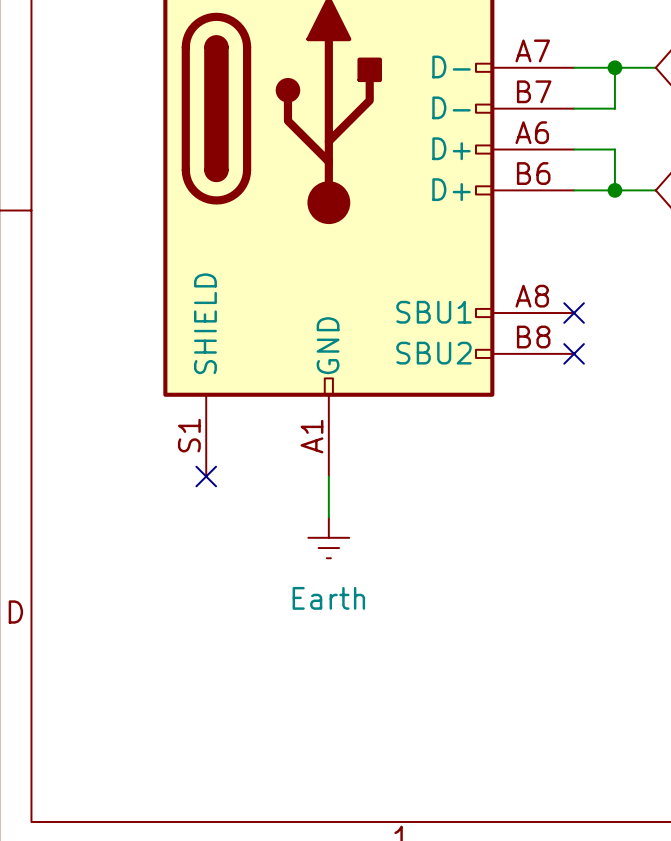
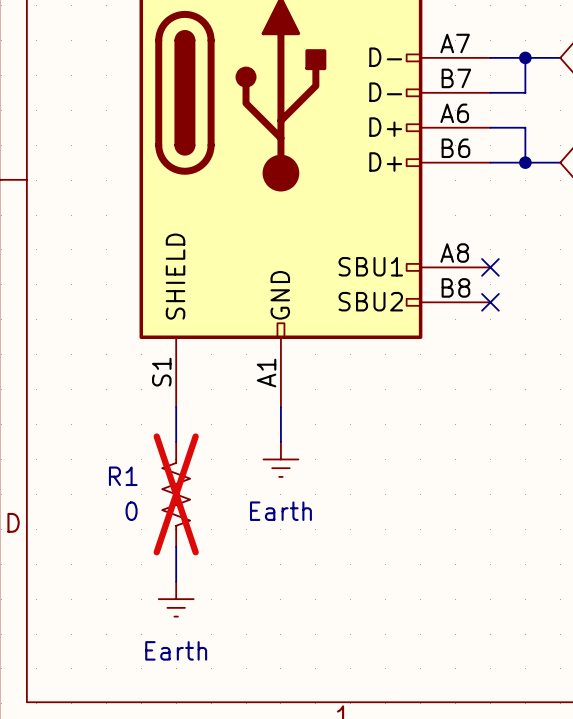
wire: none -> (176, 407) (176, 442)
no-connect mark: (206, 476) -> none
R1: none -> 0 (176, 494)
wire: none -> (176, 546) (176, 581)
power symbol: none -> Earth (176, 599)

